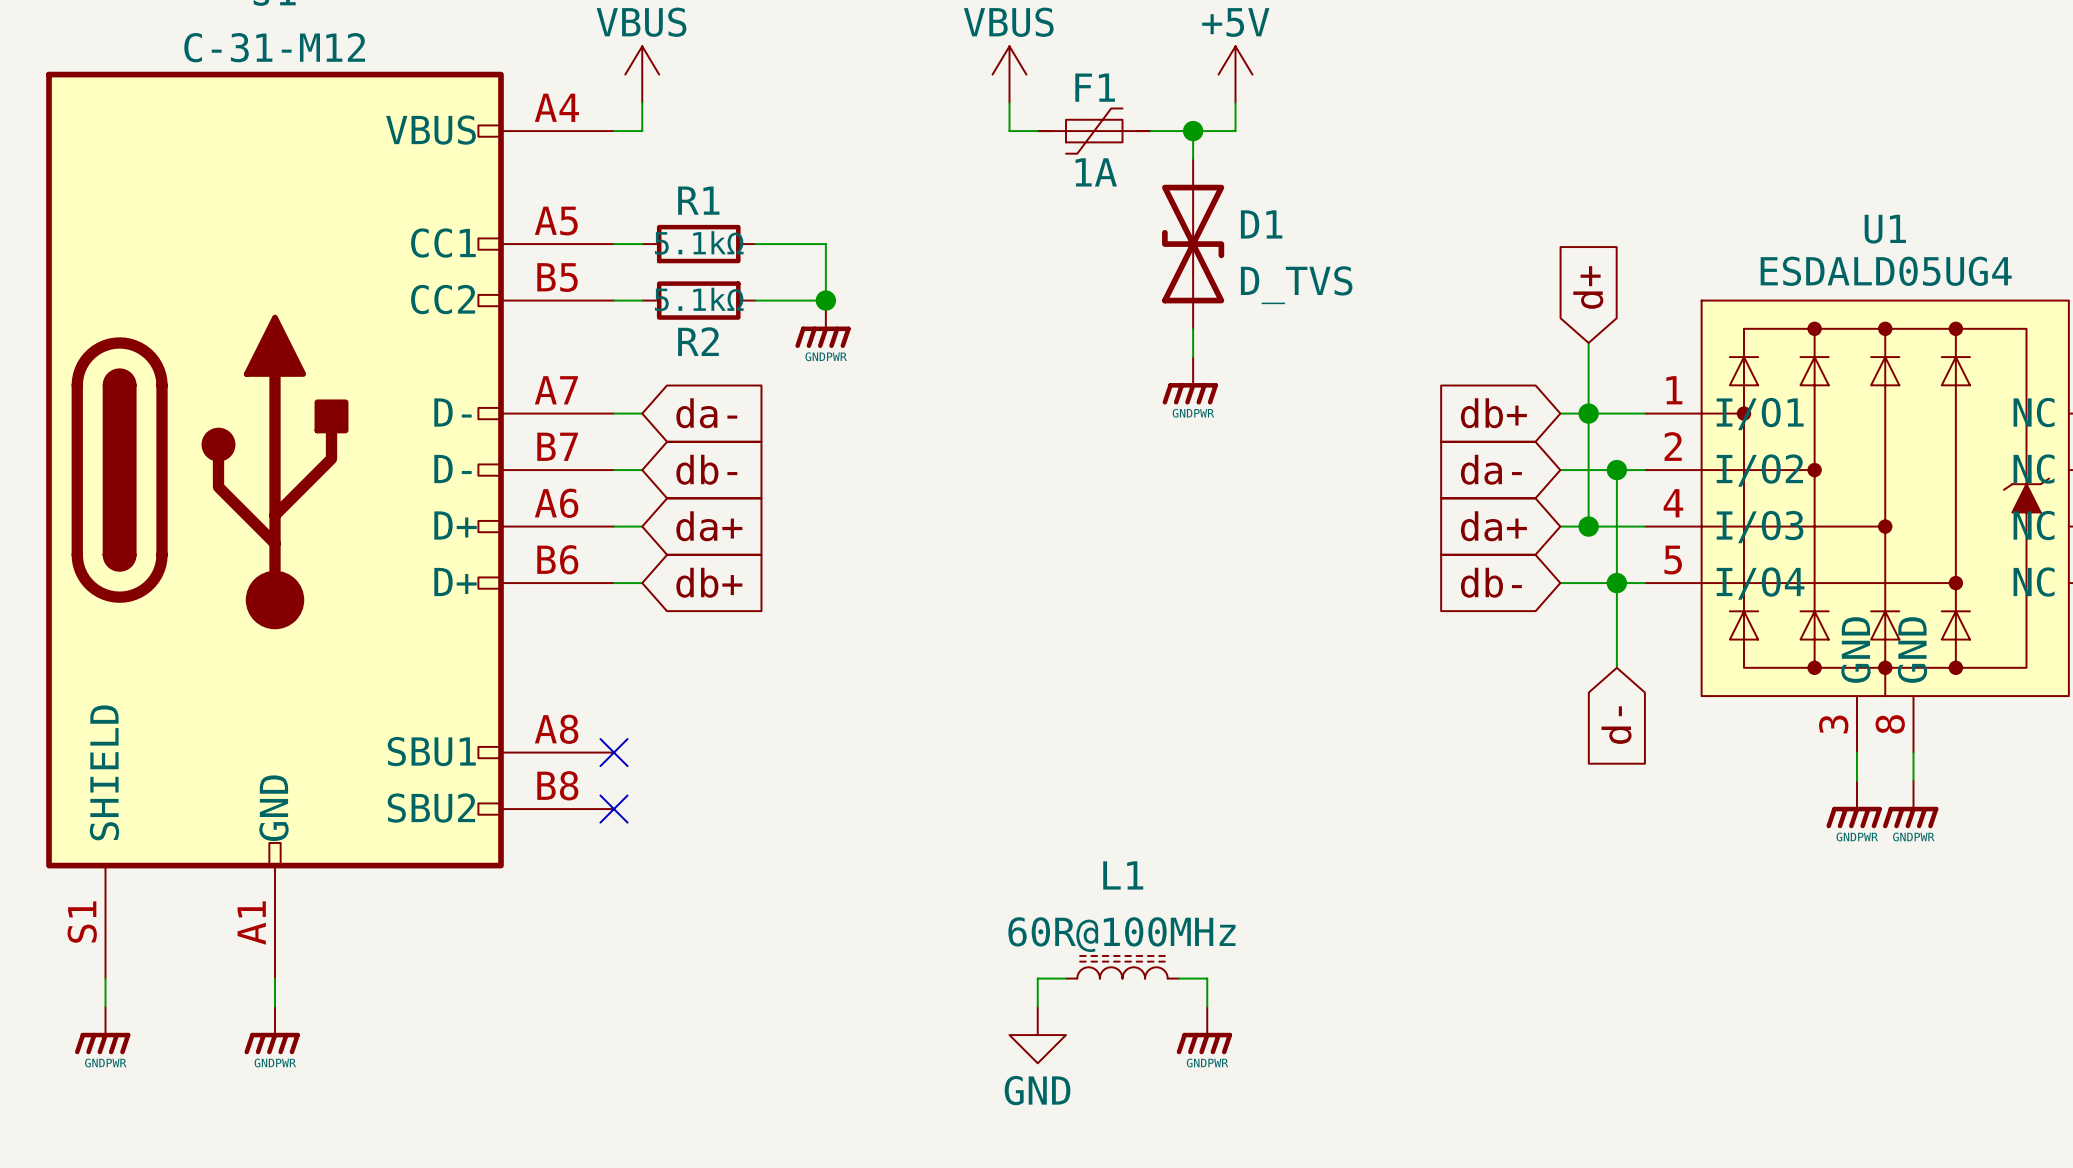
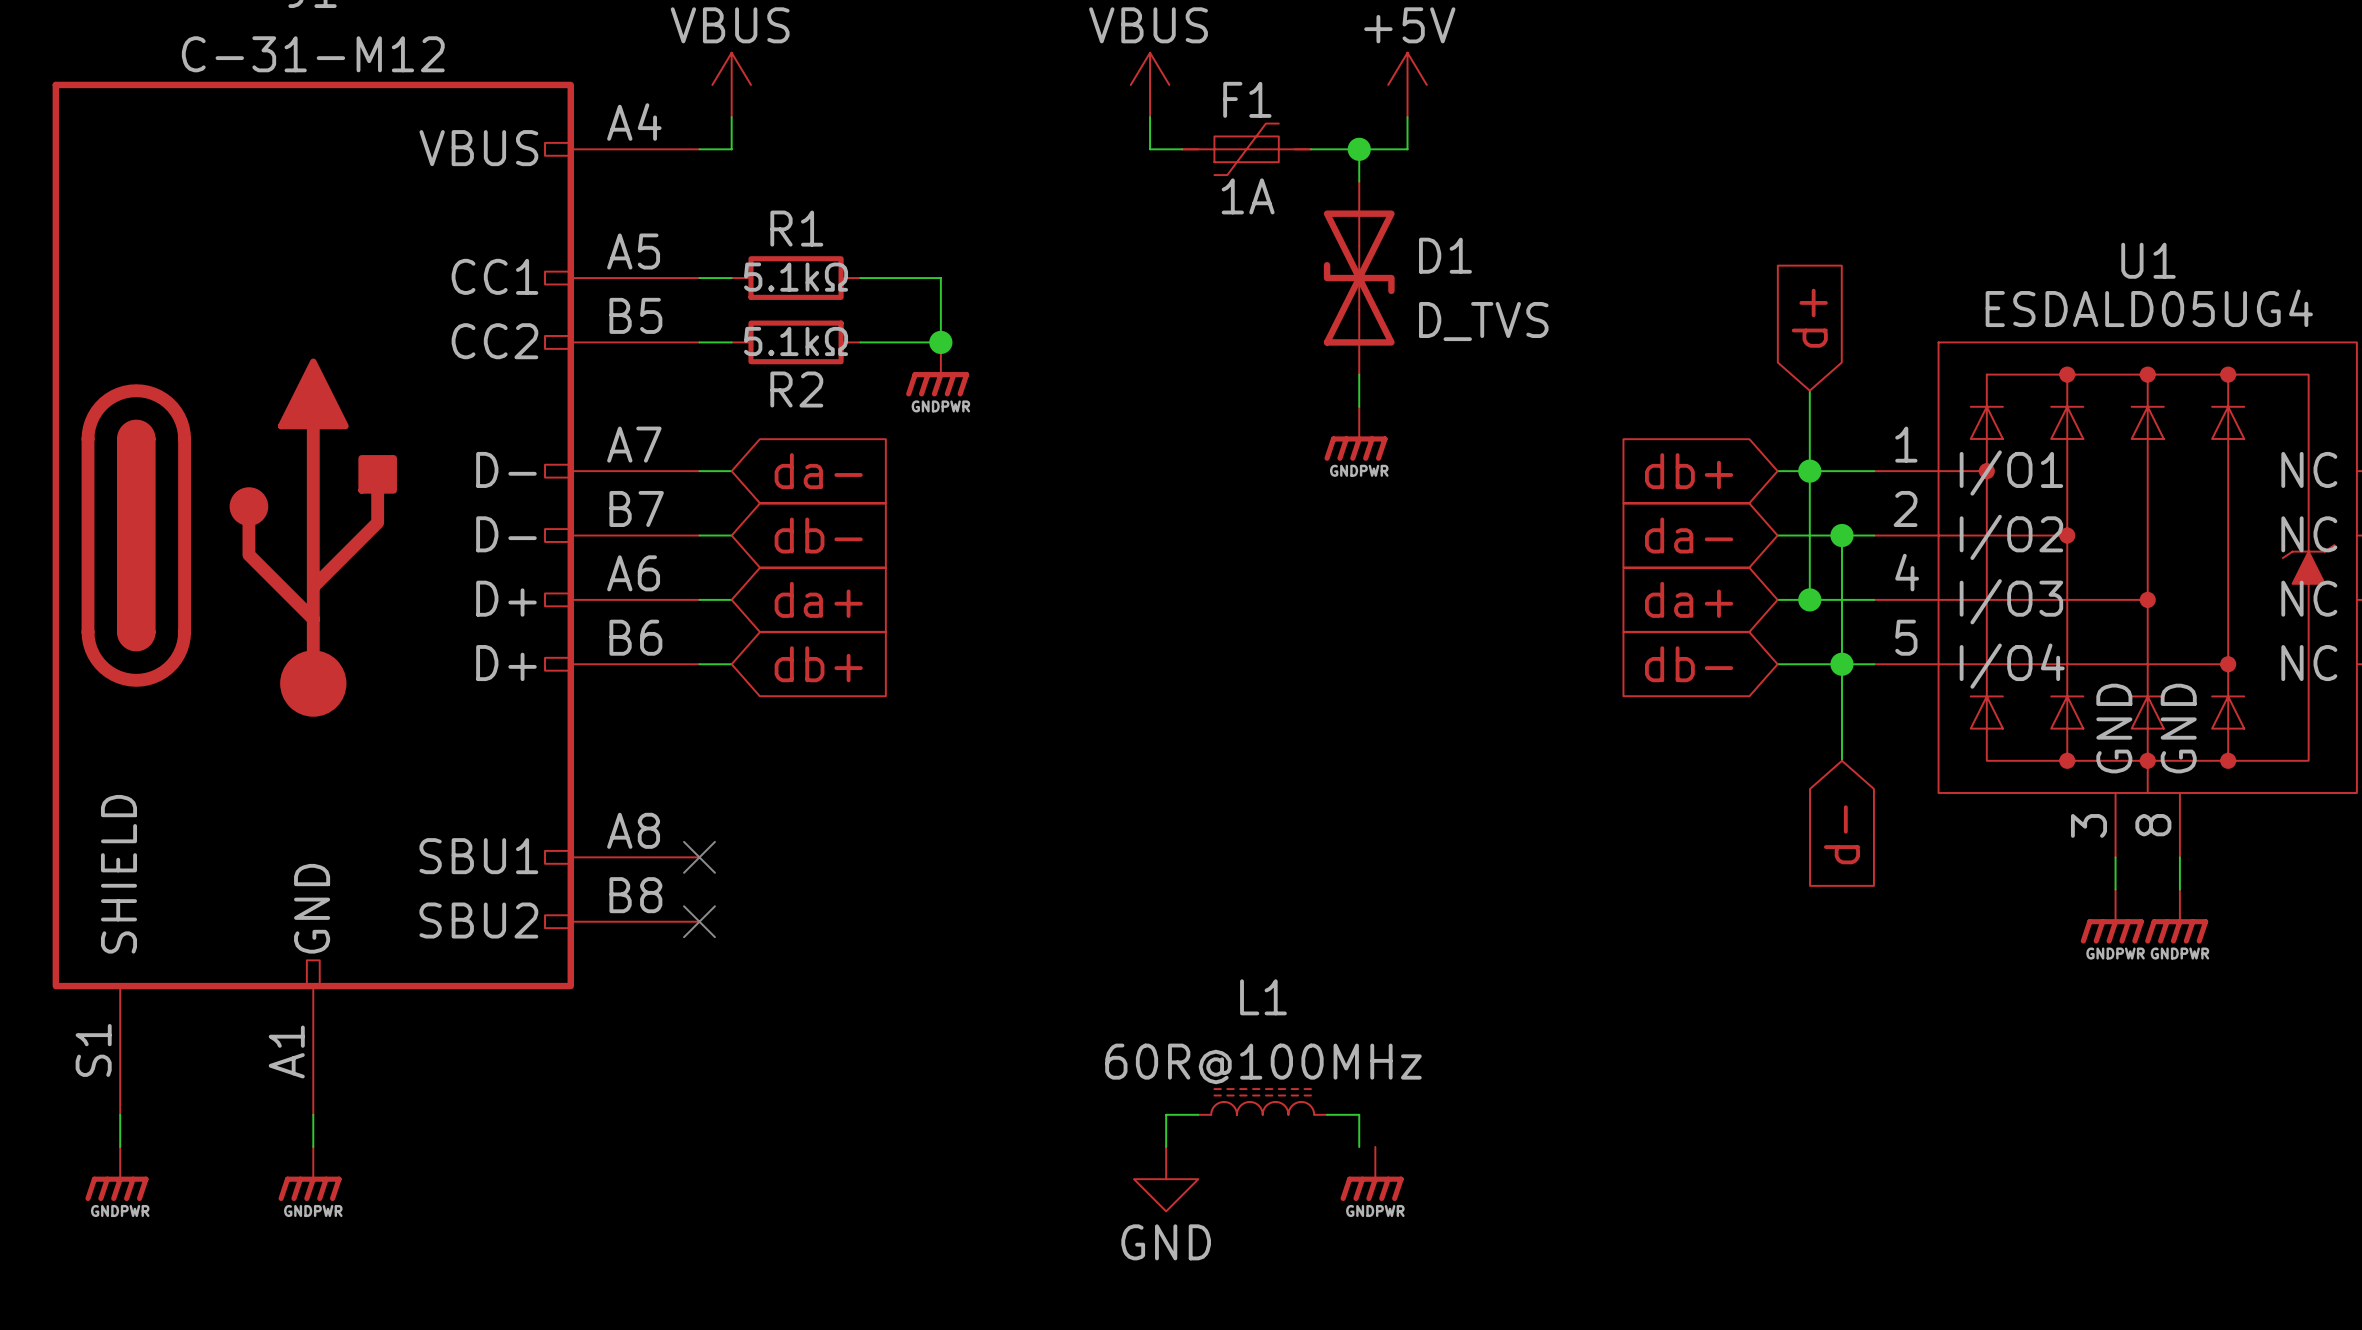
L1 position: (1122, 967) -> (1262, 1101)
wire: (1037, 978) (1037, 1006) -> (1182, 1114) (1166, 1114) (1166, 1147)
wire: (1193, 978) (1207, 978) (1207, 1006) -> (1359, 1114) (1359, 1147)
power symbol position: GND (1037, 1035) -> GND (1166, 1179)

